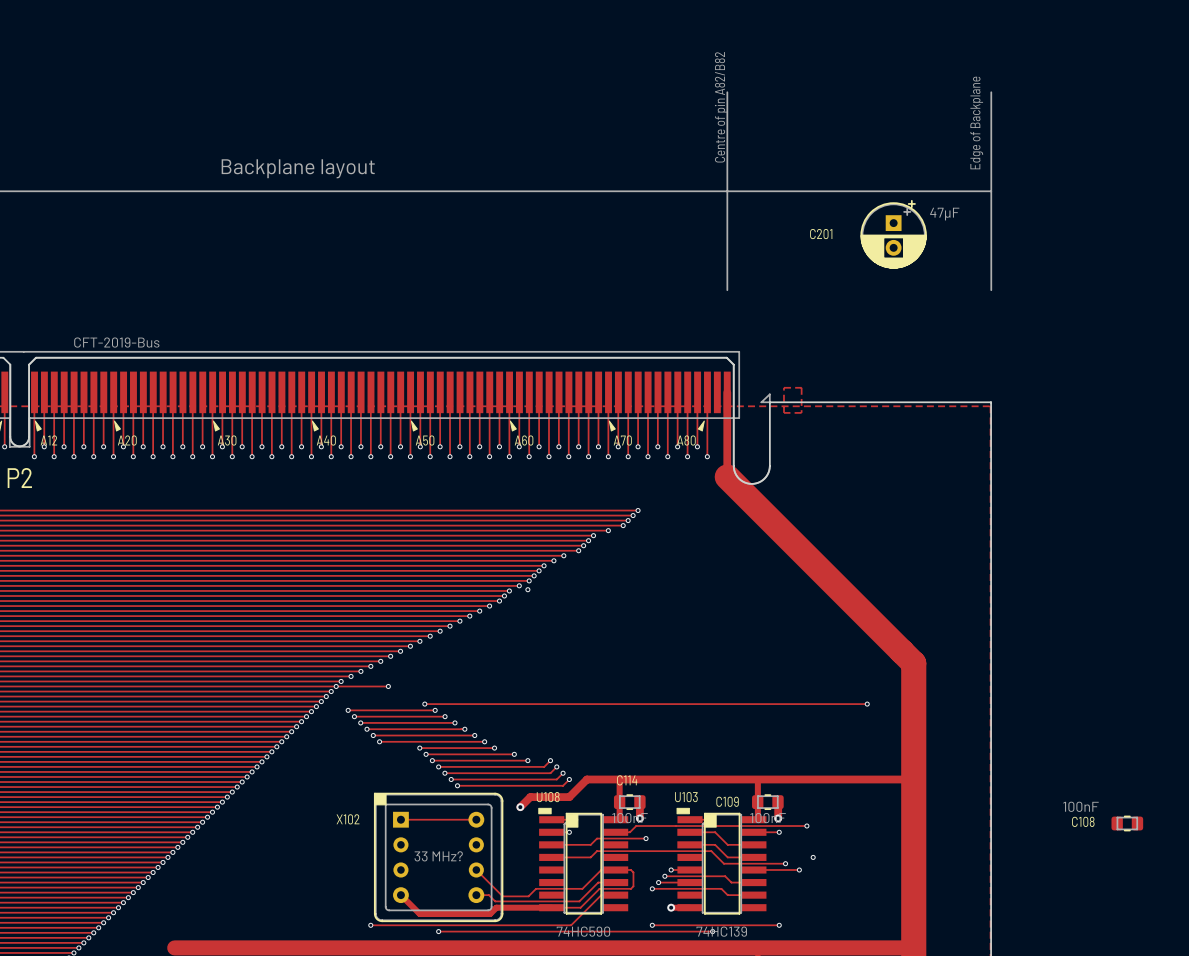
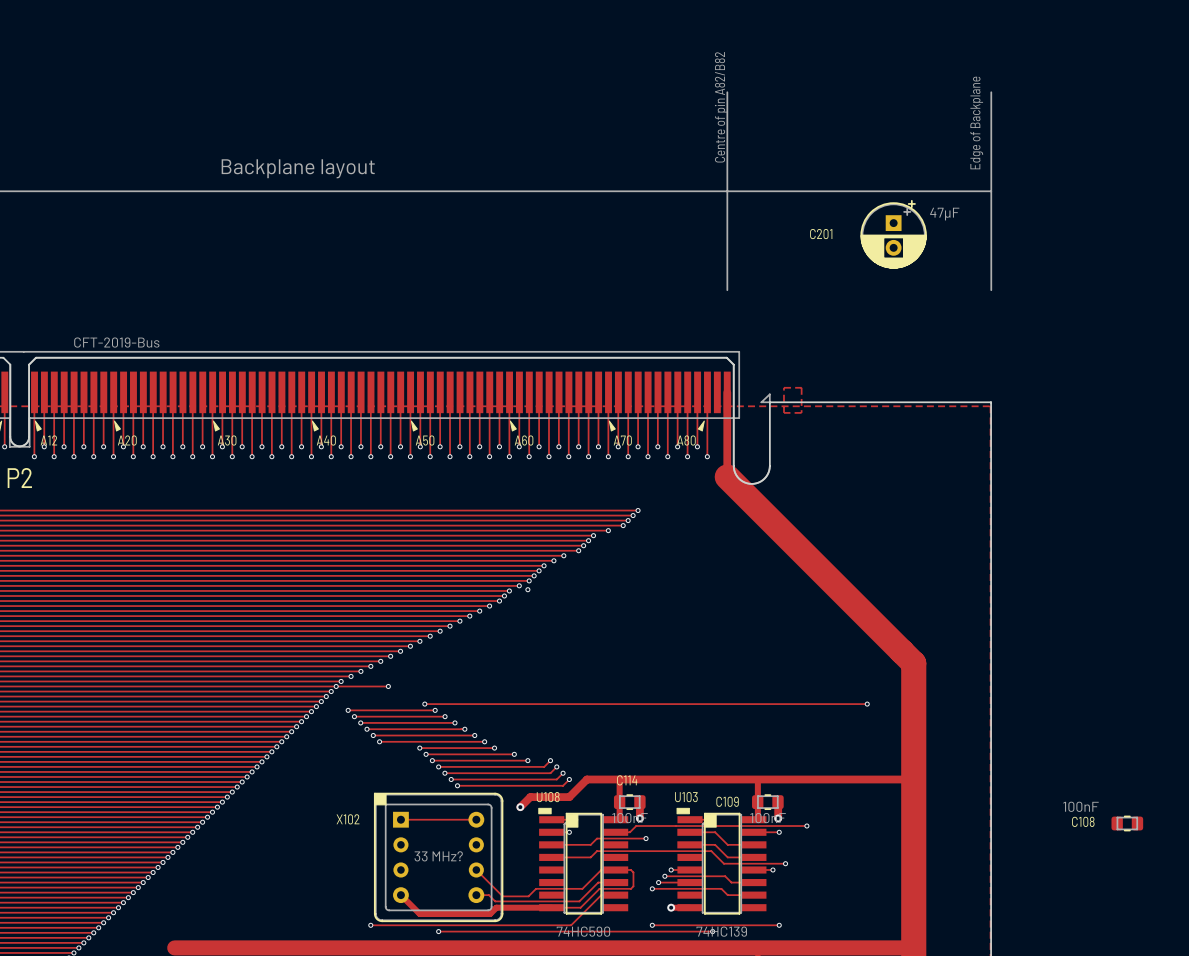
via: (813, 857) -> none
track: (772, 869) (799, 869) -> none
via: none -> (772, 869)
via: (799, 869) -> none

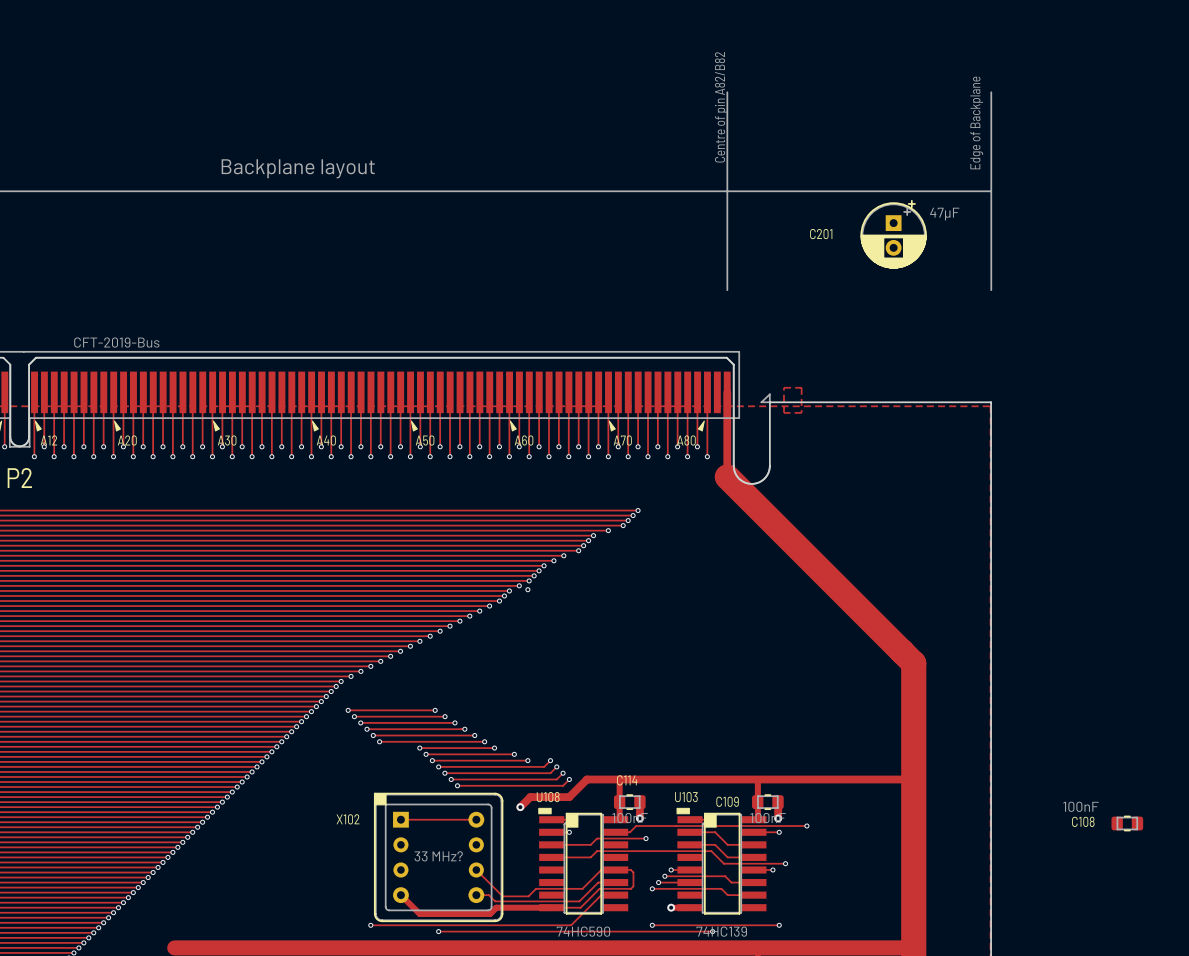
track: (336, 686) (388, 686) -> none
via: (388, 686) -> none
track: (424, 704) (867, 704) -> none
via: (424, 704) -> none
via: (867, 704) -> none

